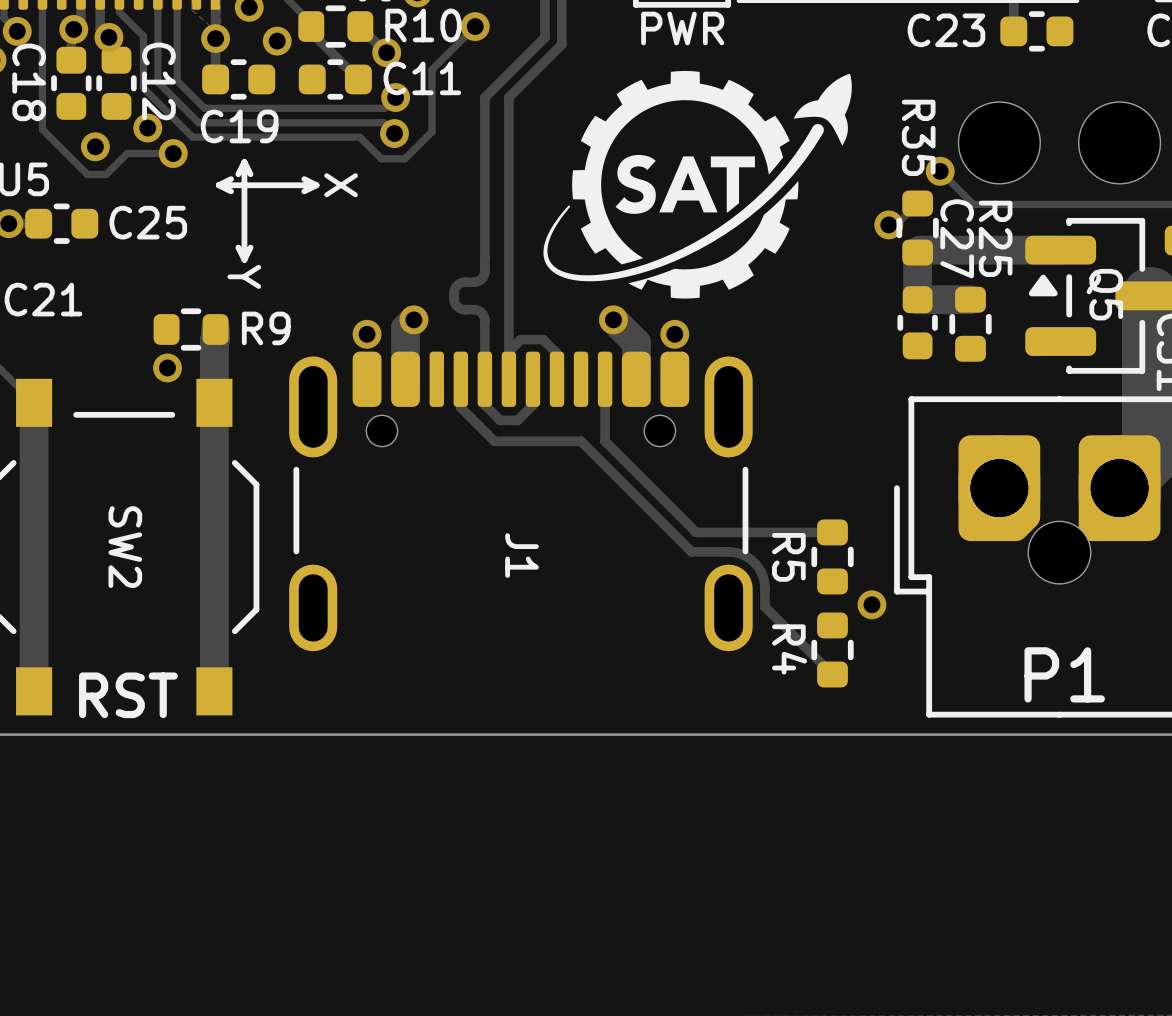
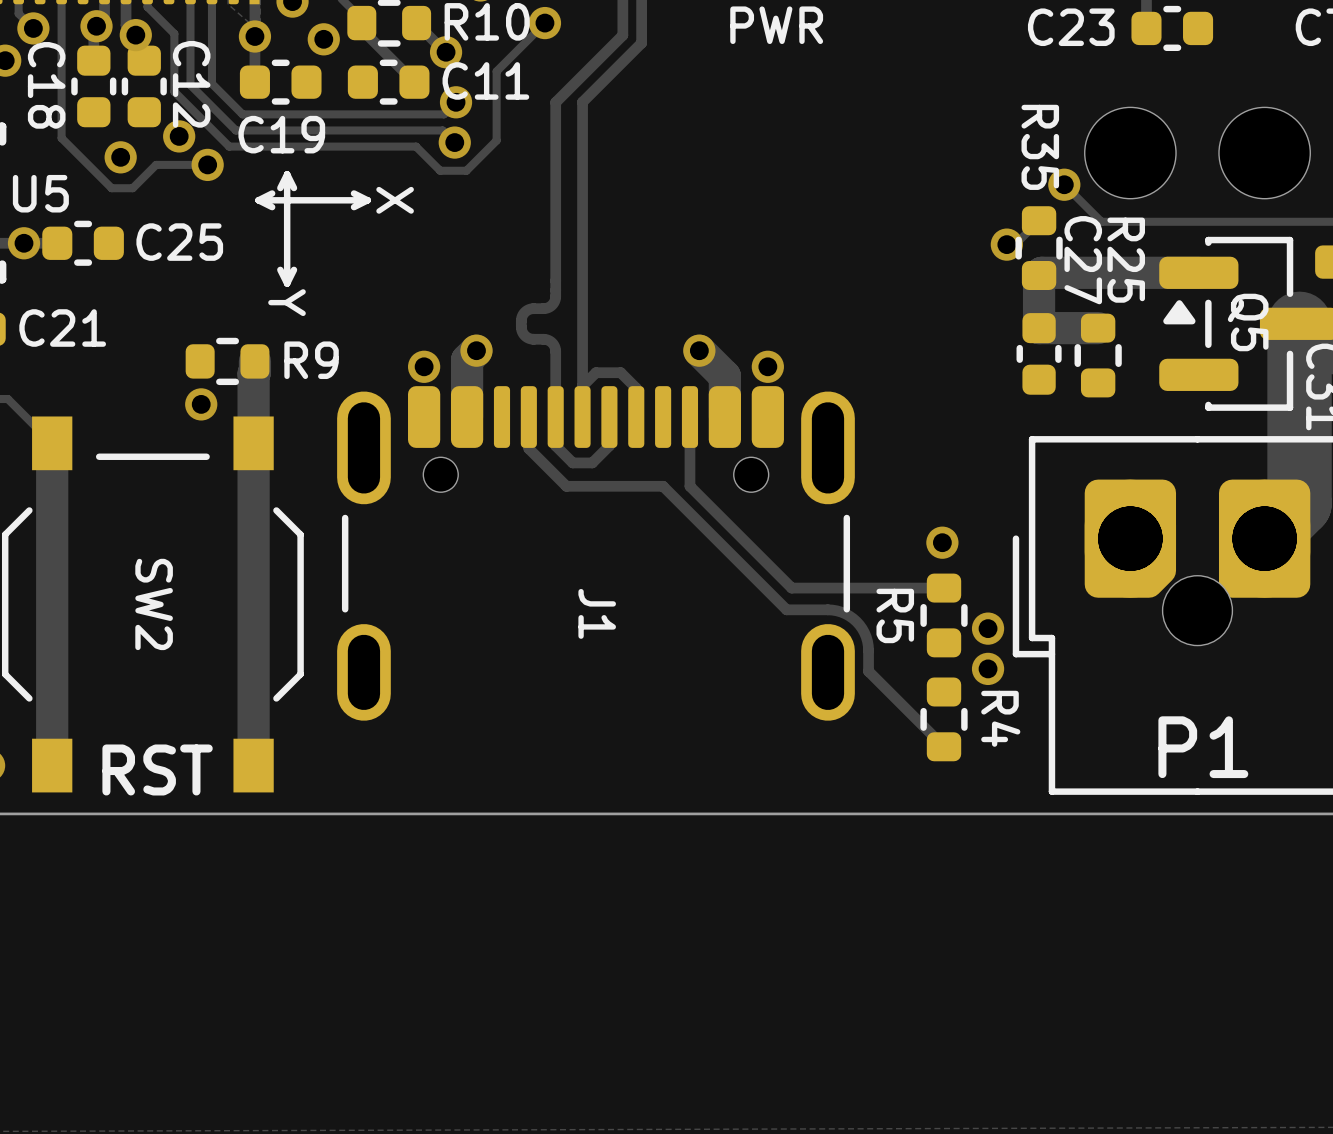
drawing: [543, 70, 852, 299] -> none
via: none -> (942, 542)
via: none -> (988, 628)
R4 name position: R4 (789, 649) -> R4 (1000, 718)

